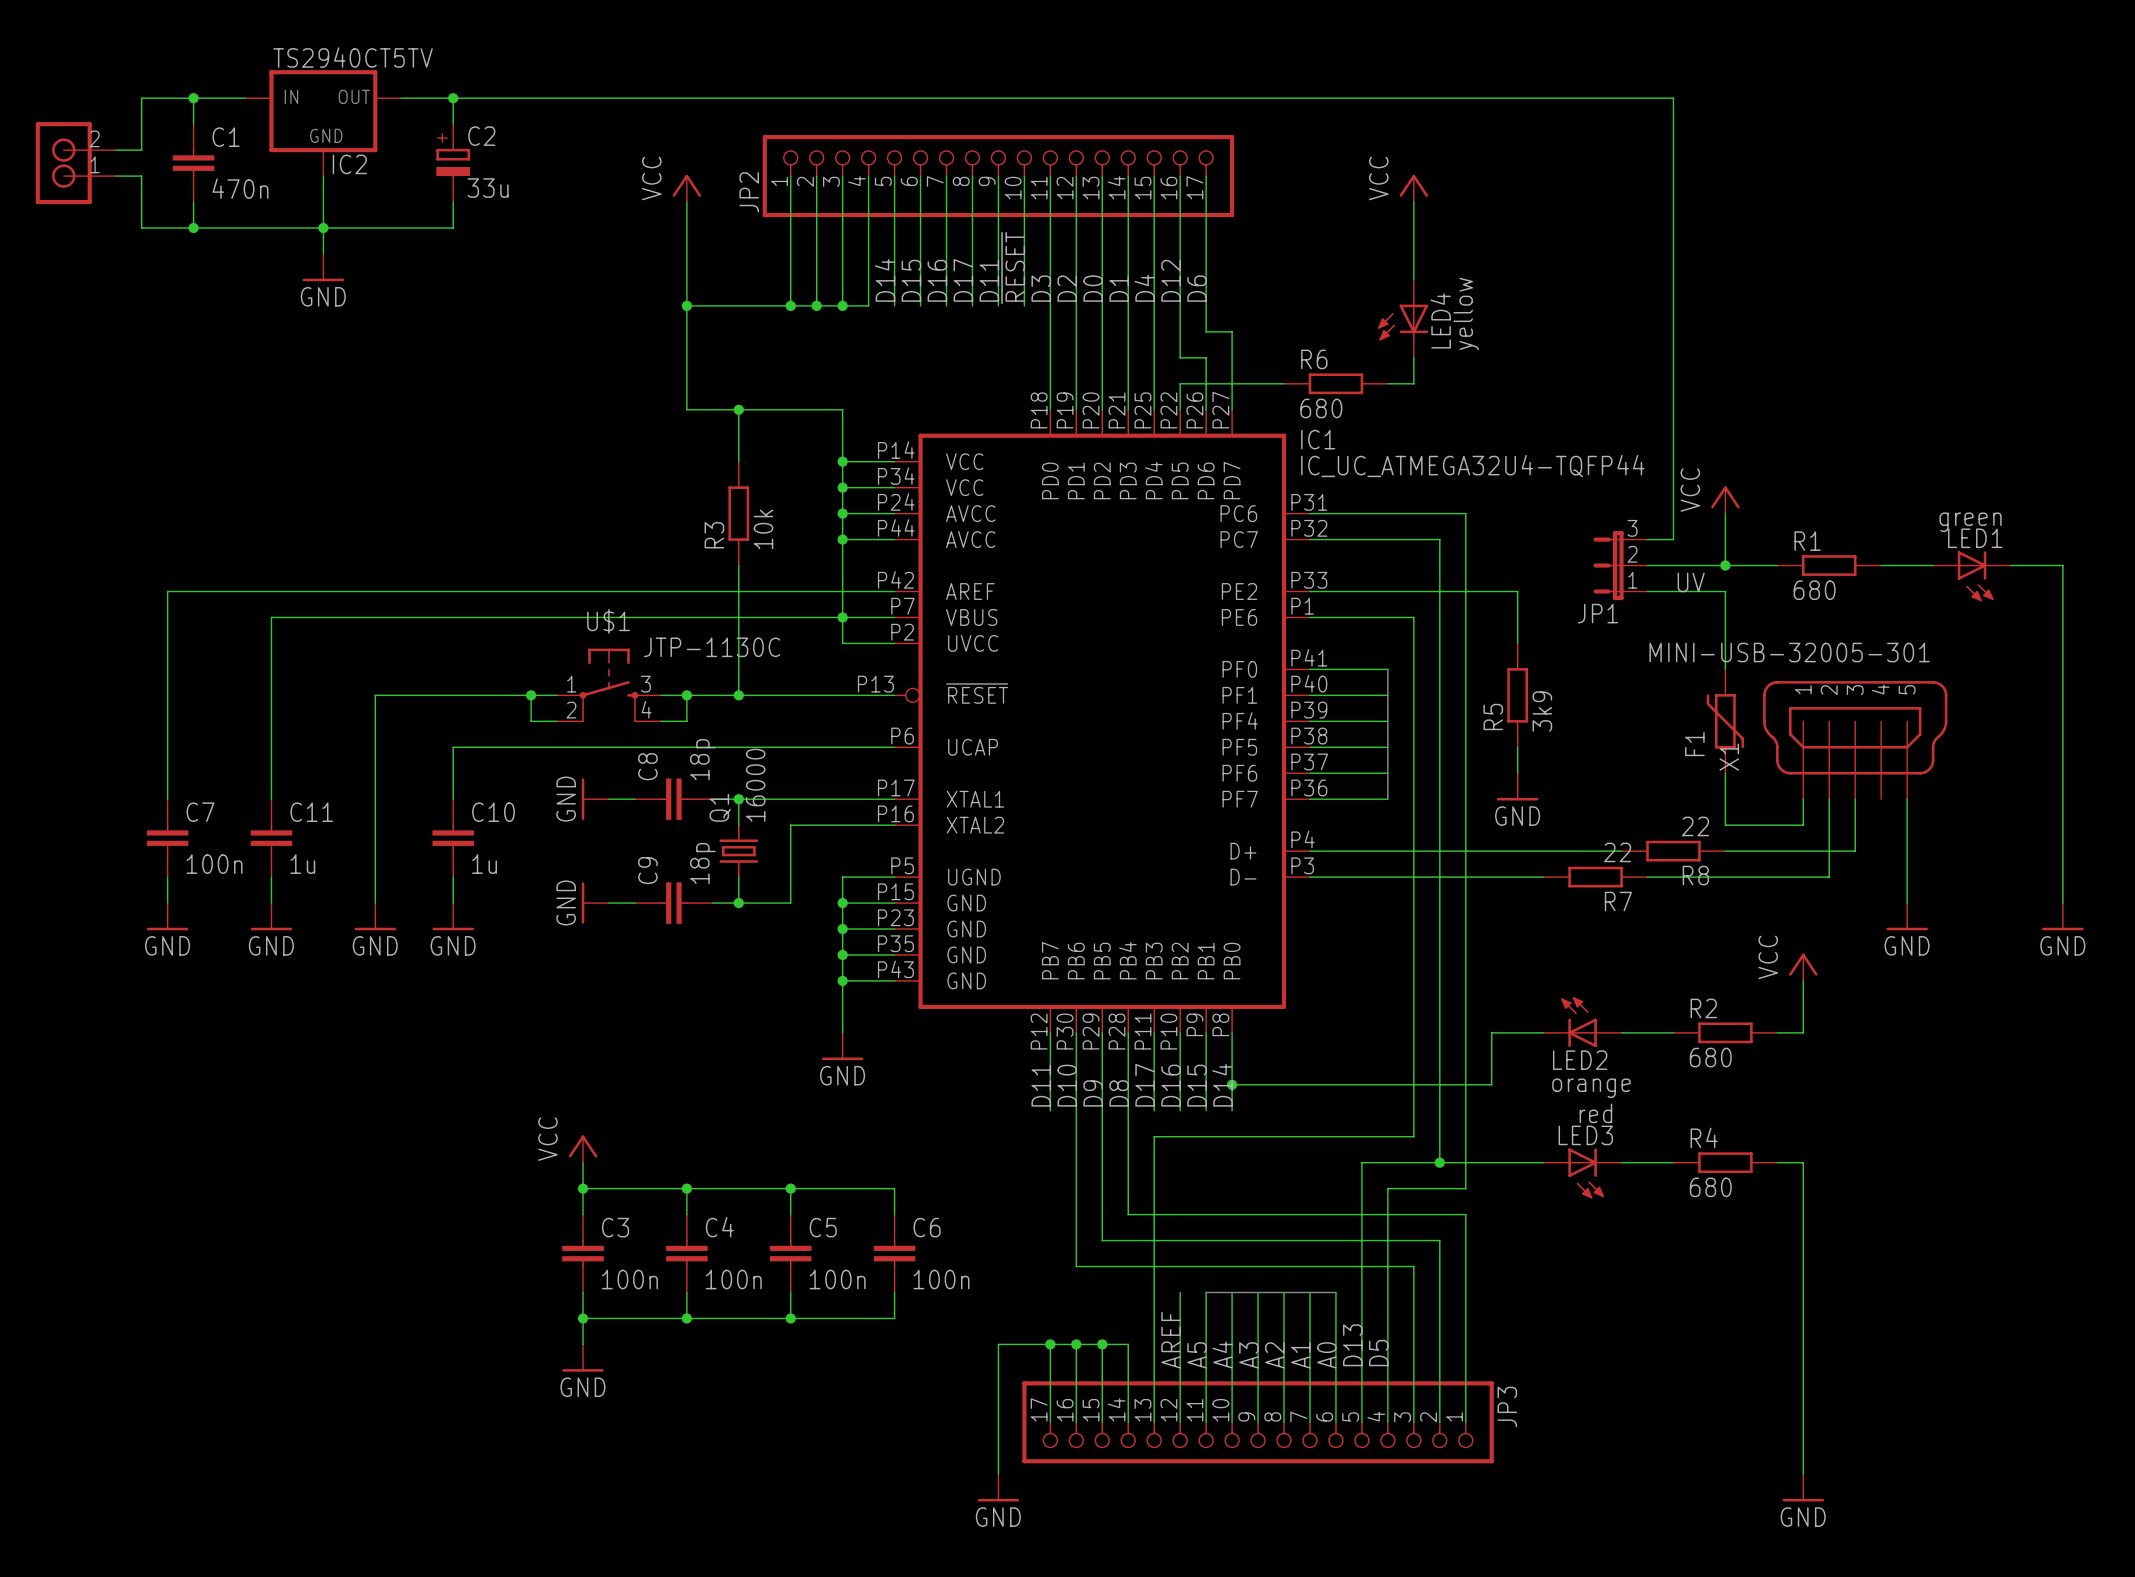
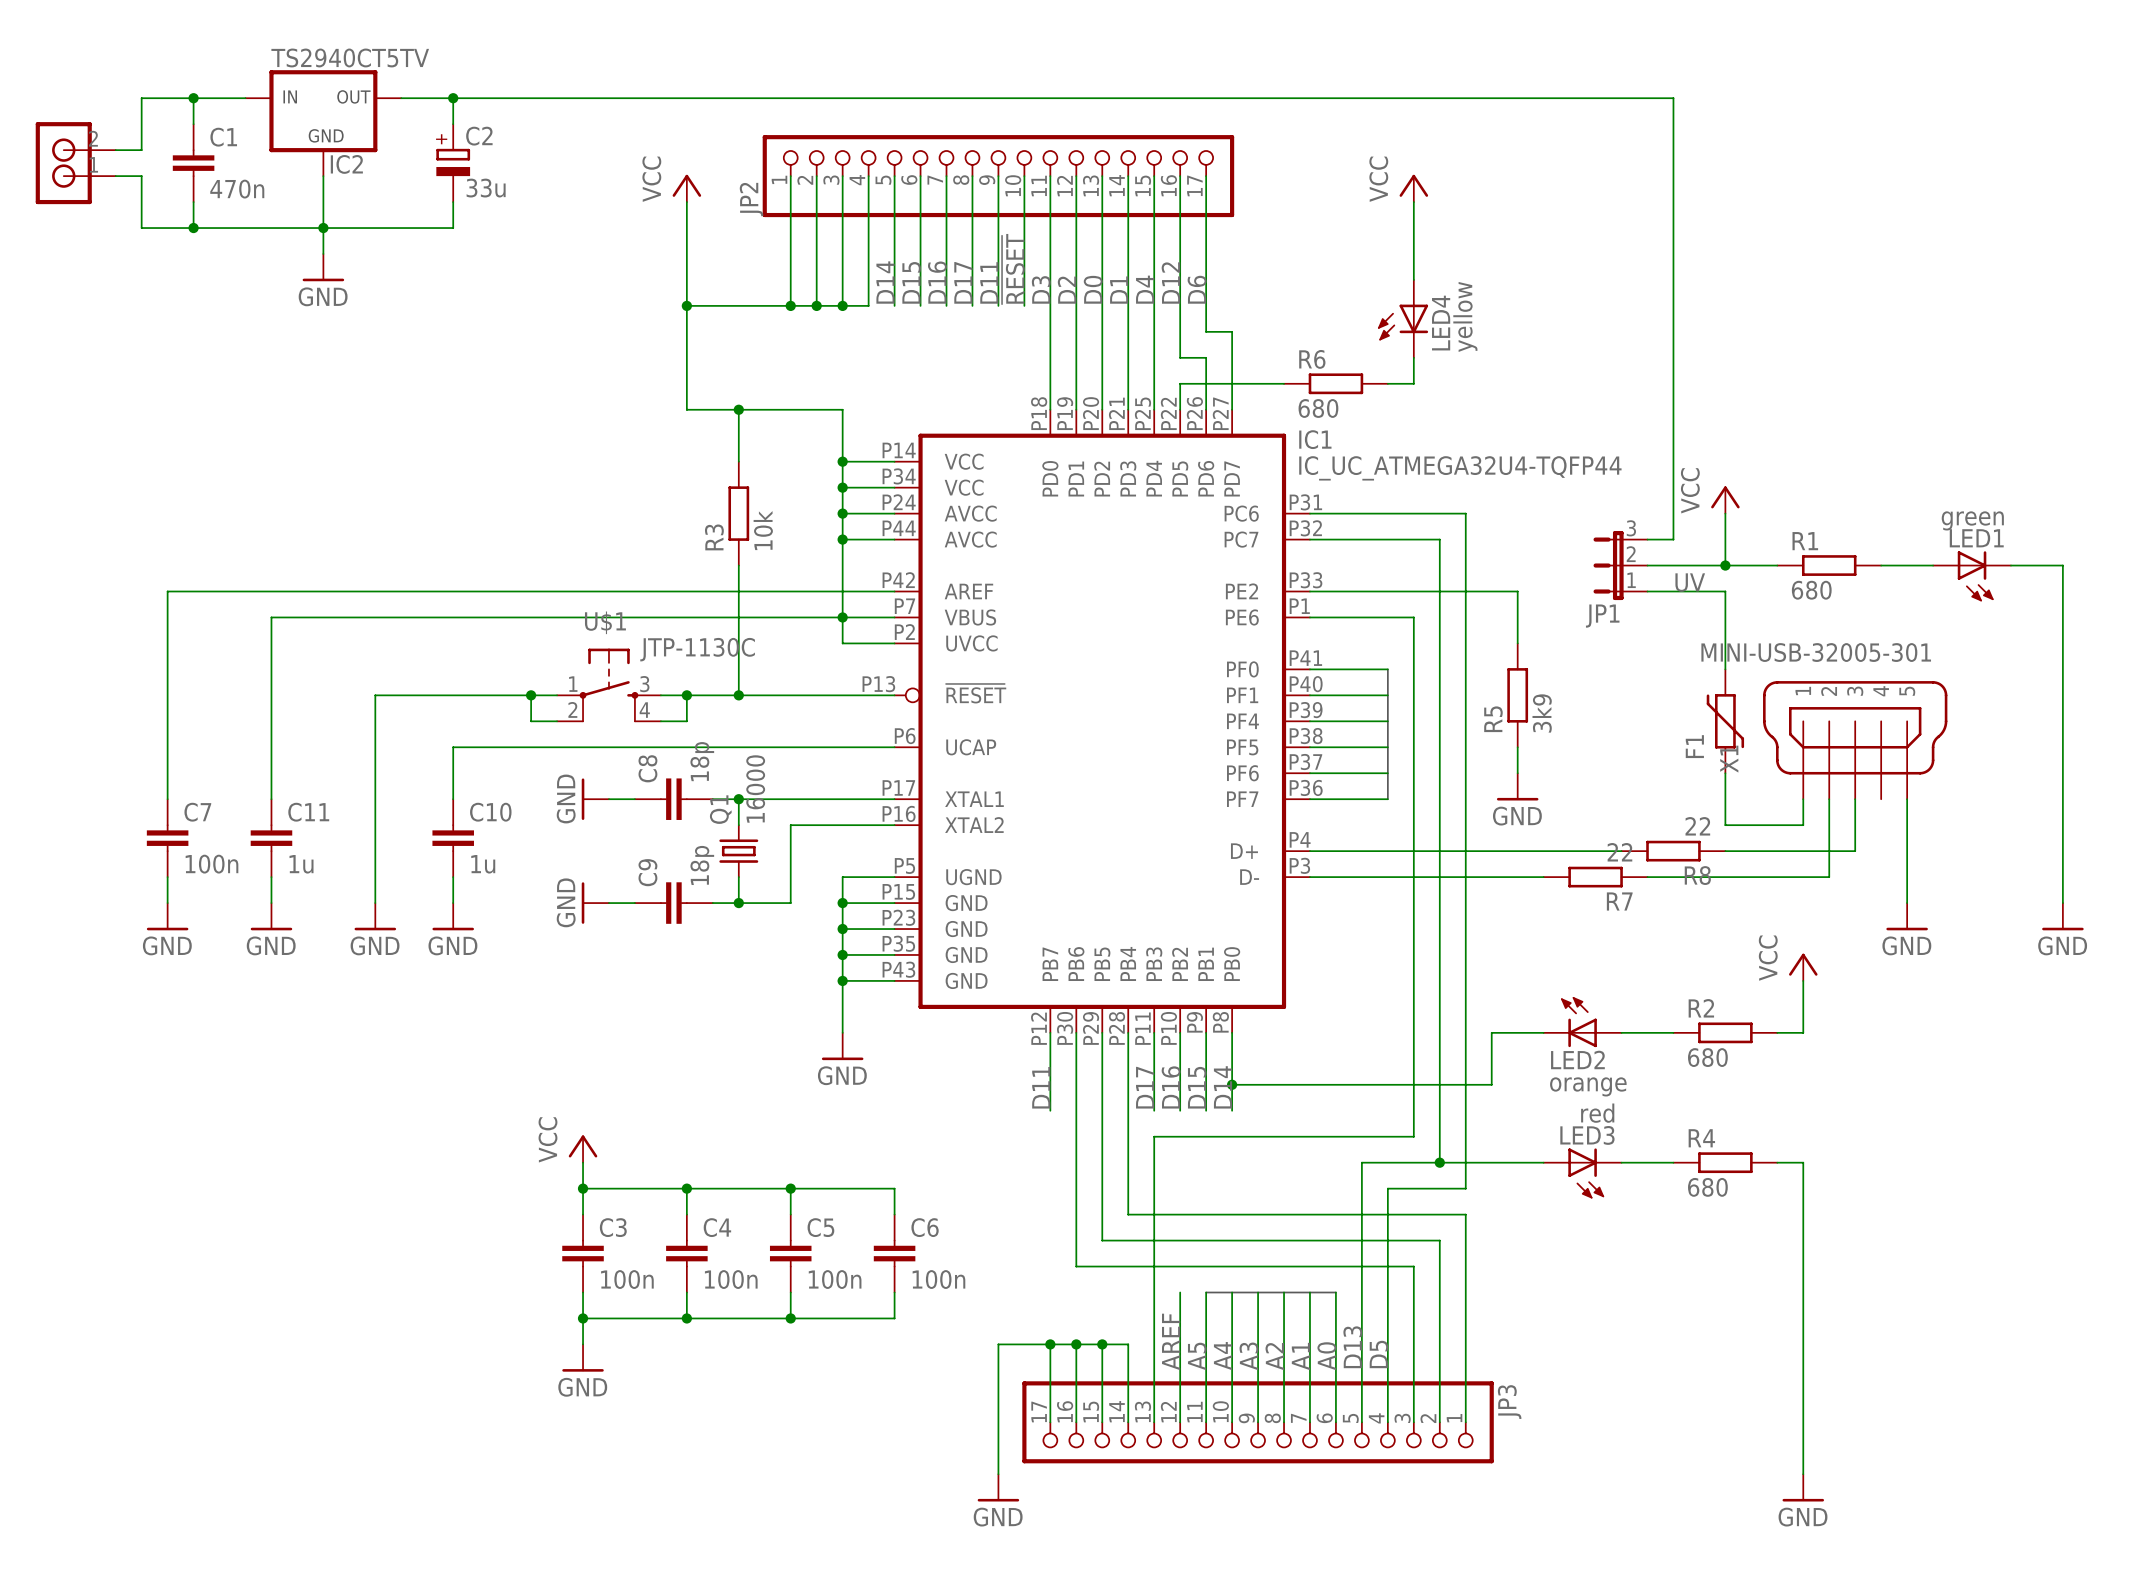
label: D10 (1067, 1085) -> none
label: D9 (1093, 1093) -> none
label: D8 (1119, 1093) -> none

